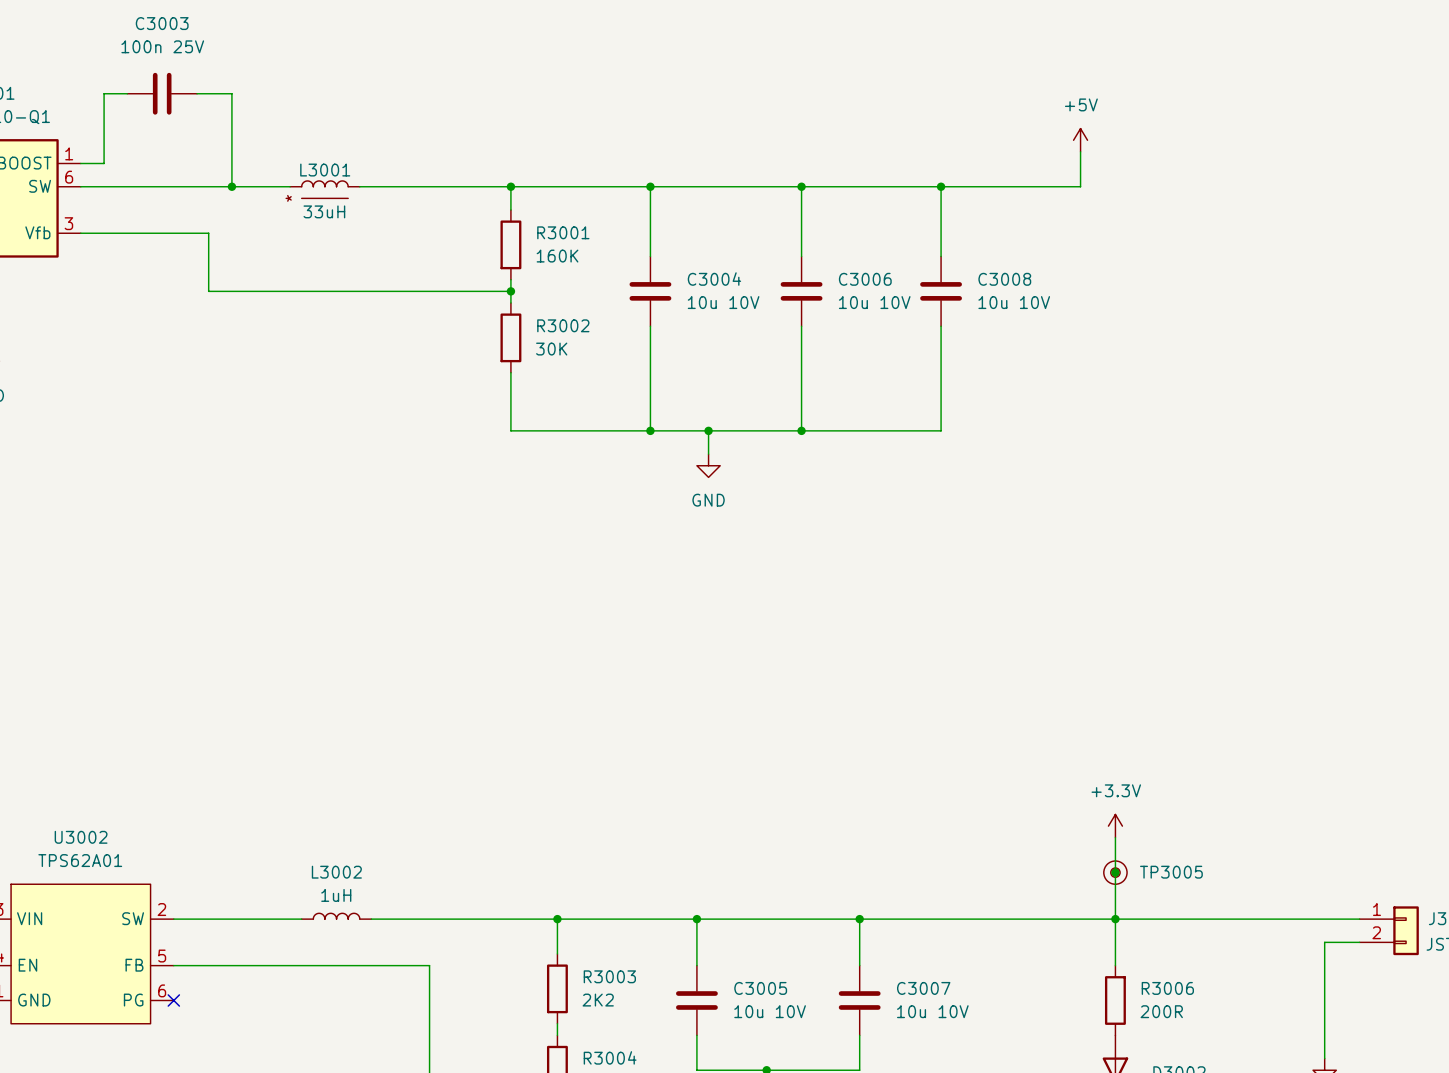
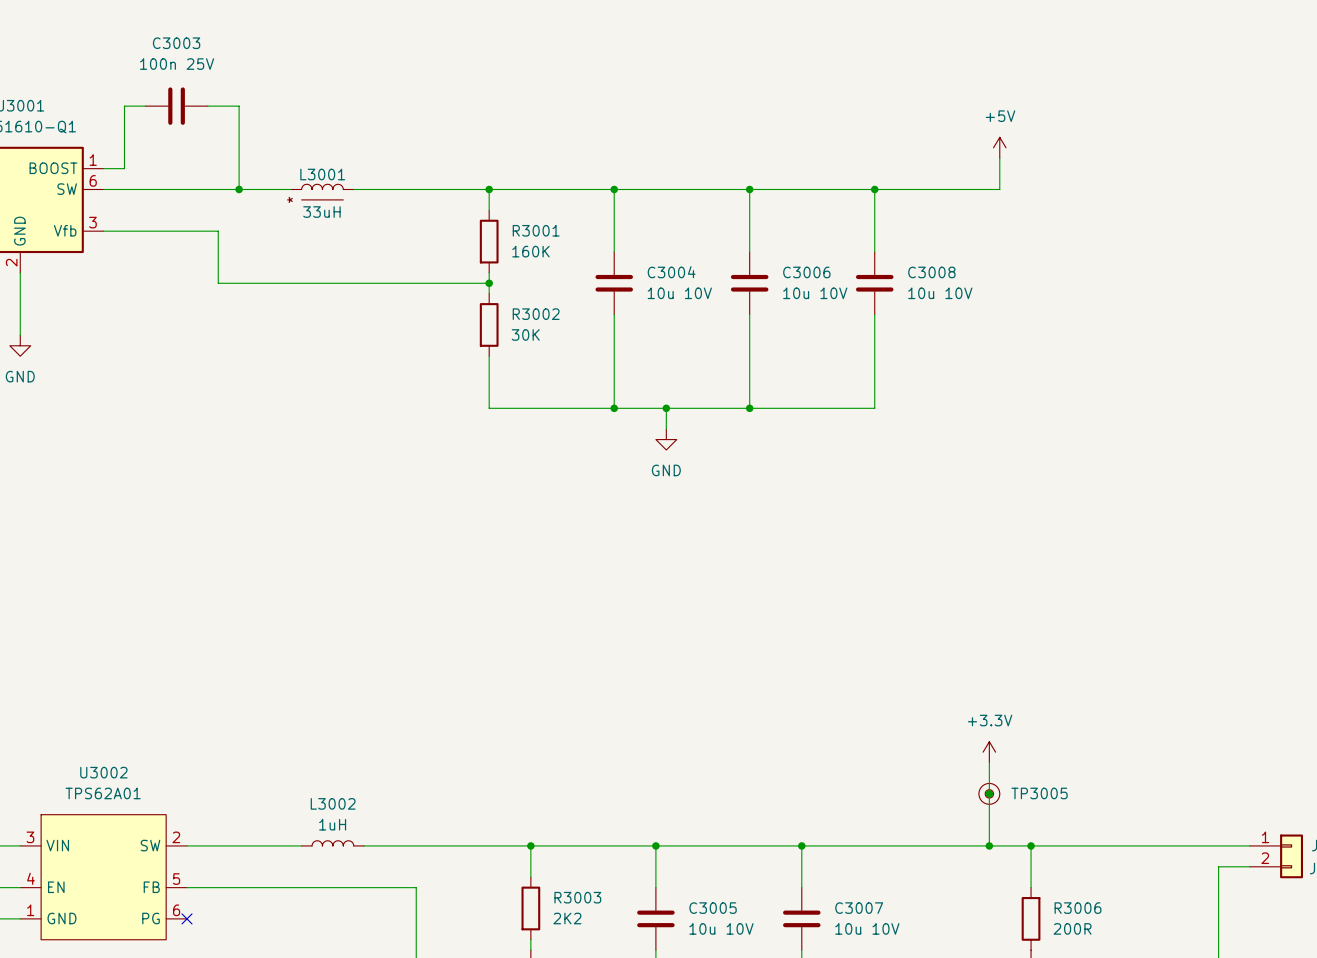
wire: none -> (989, 762) (989, 845)
power symbol position: +3.3V (1115, 826) -> +3.3V (989, 752)
wire: (1115, 837) (1115, 919) -> none
junction: none -> (989, 793)
junction: (1115, 872) -> none
TP3005 position: (1115, 872) -> (989, 793)
junction: none -> (989, 845)

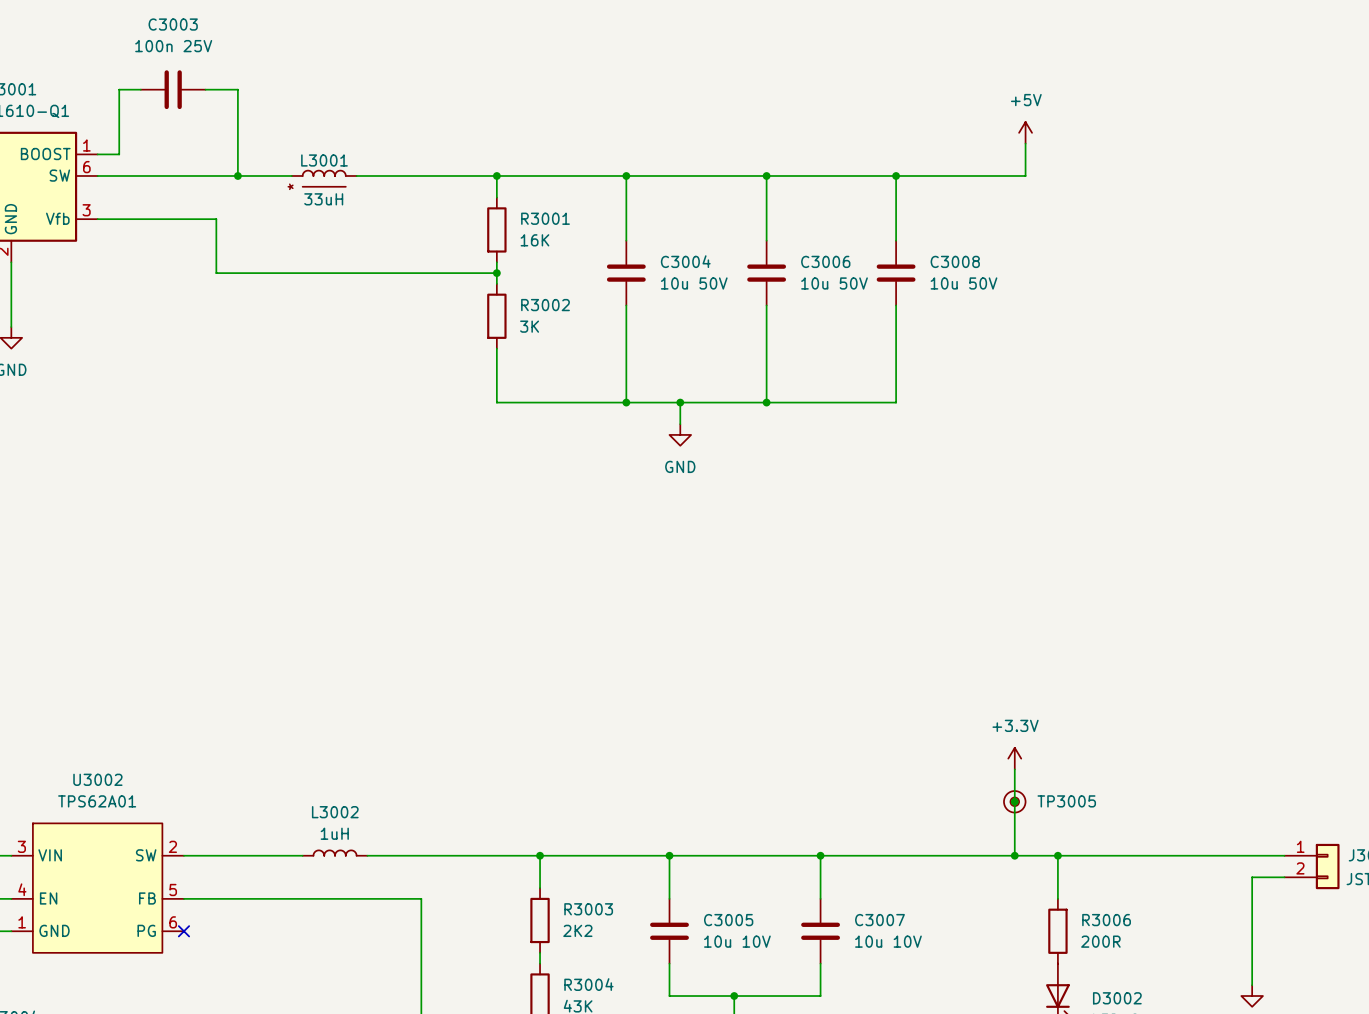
R3001 value: 160K (530, 251) -> 16K (534, 240)
C3004 value: 10u 10V (679, 293) -> 10u 50V (694, 283)
C3006 value: 10u 10V (815, 293) -> 10u 50V (834, 283)
C3008 value: 10u 10V (940, 293) -> 10u 50V (963, 283)
R3002 value: 30K (525, 334) -> 3K (529, 326)

